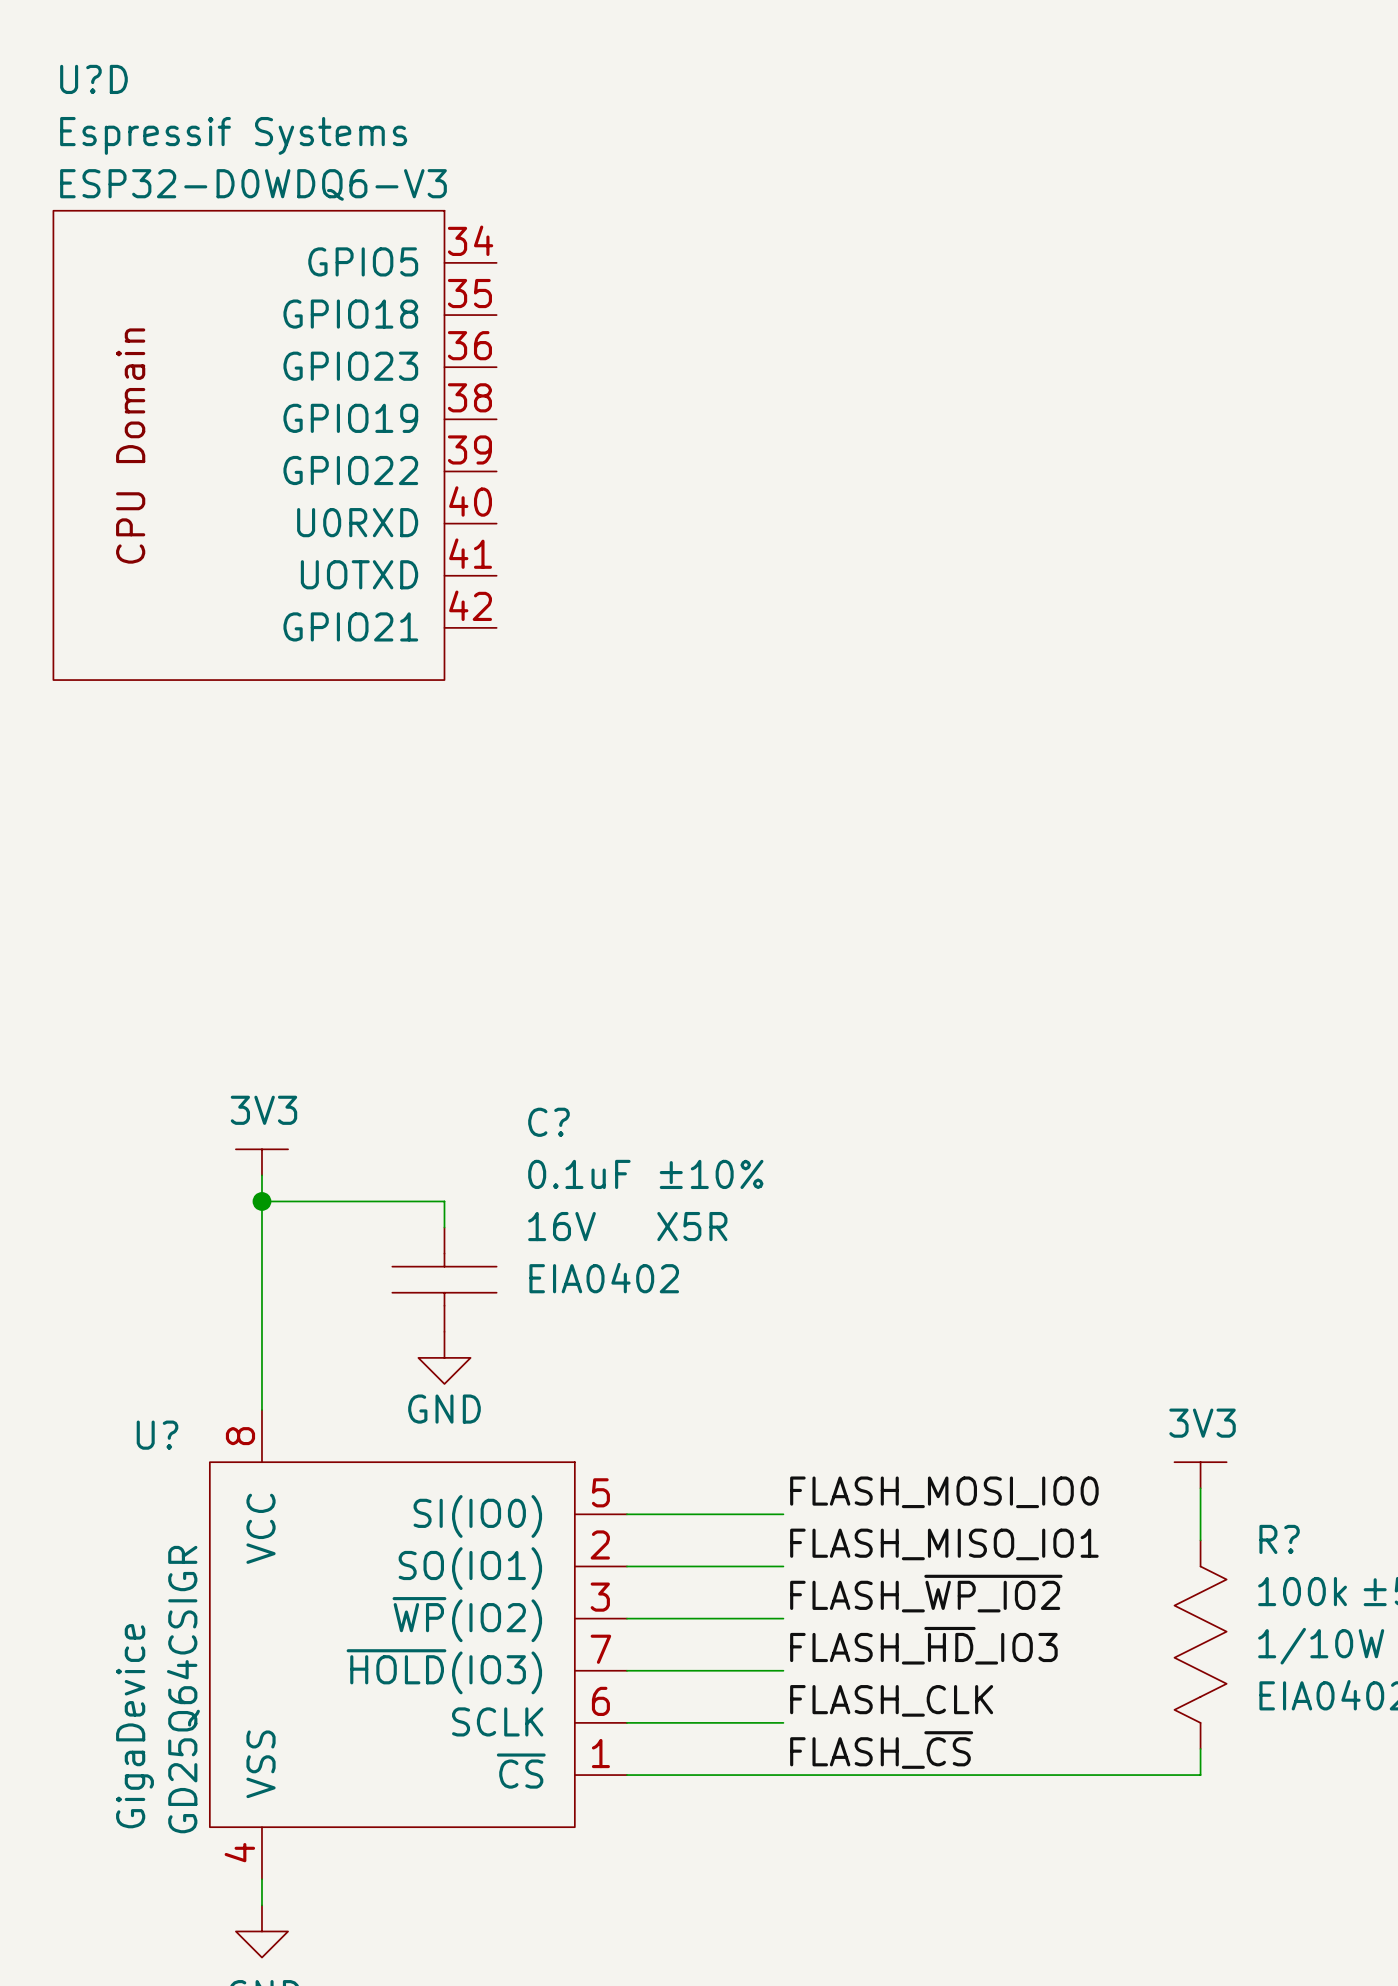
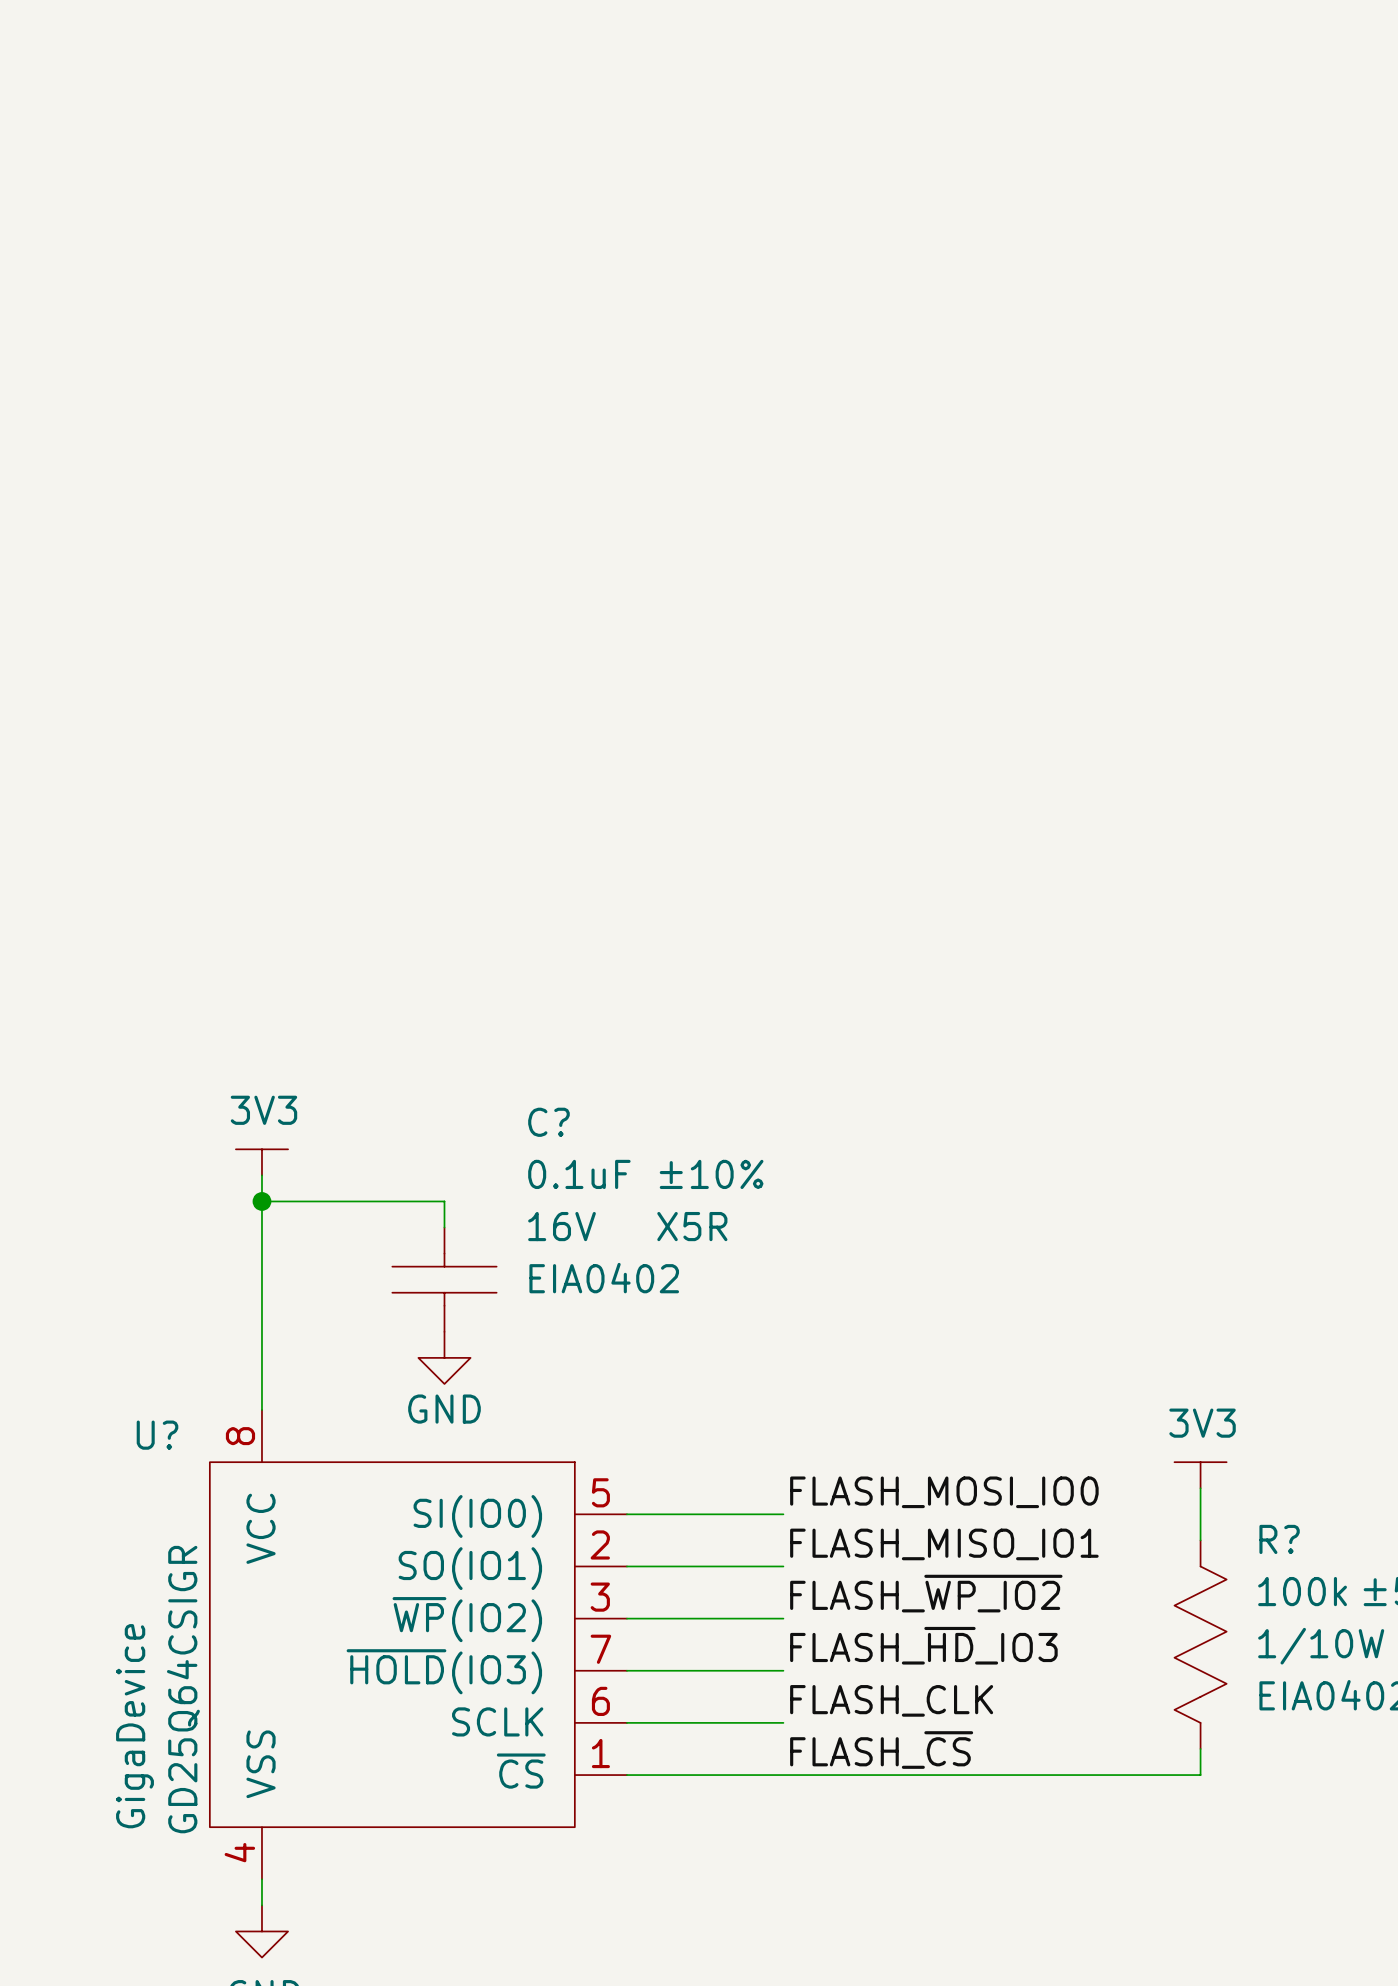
U?D: (275, 445) -> none

